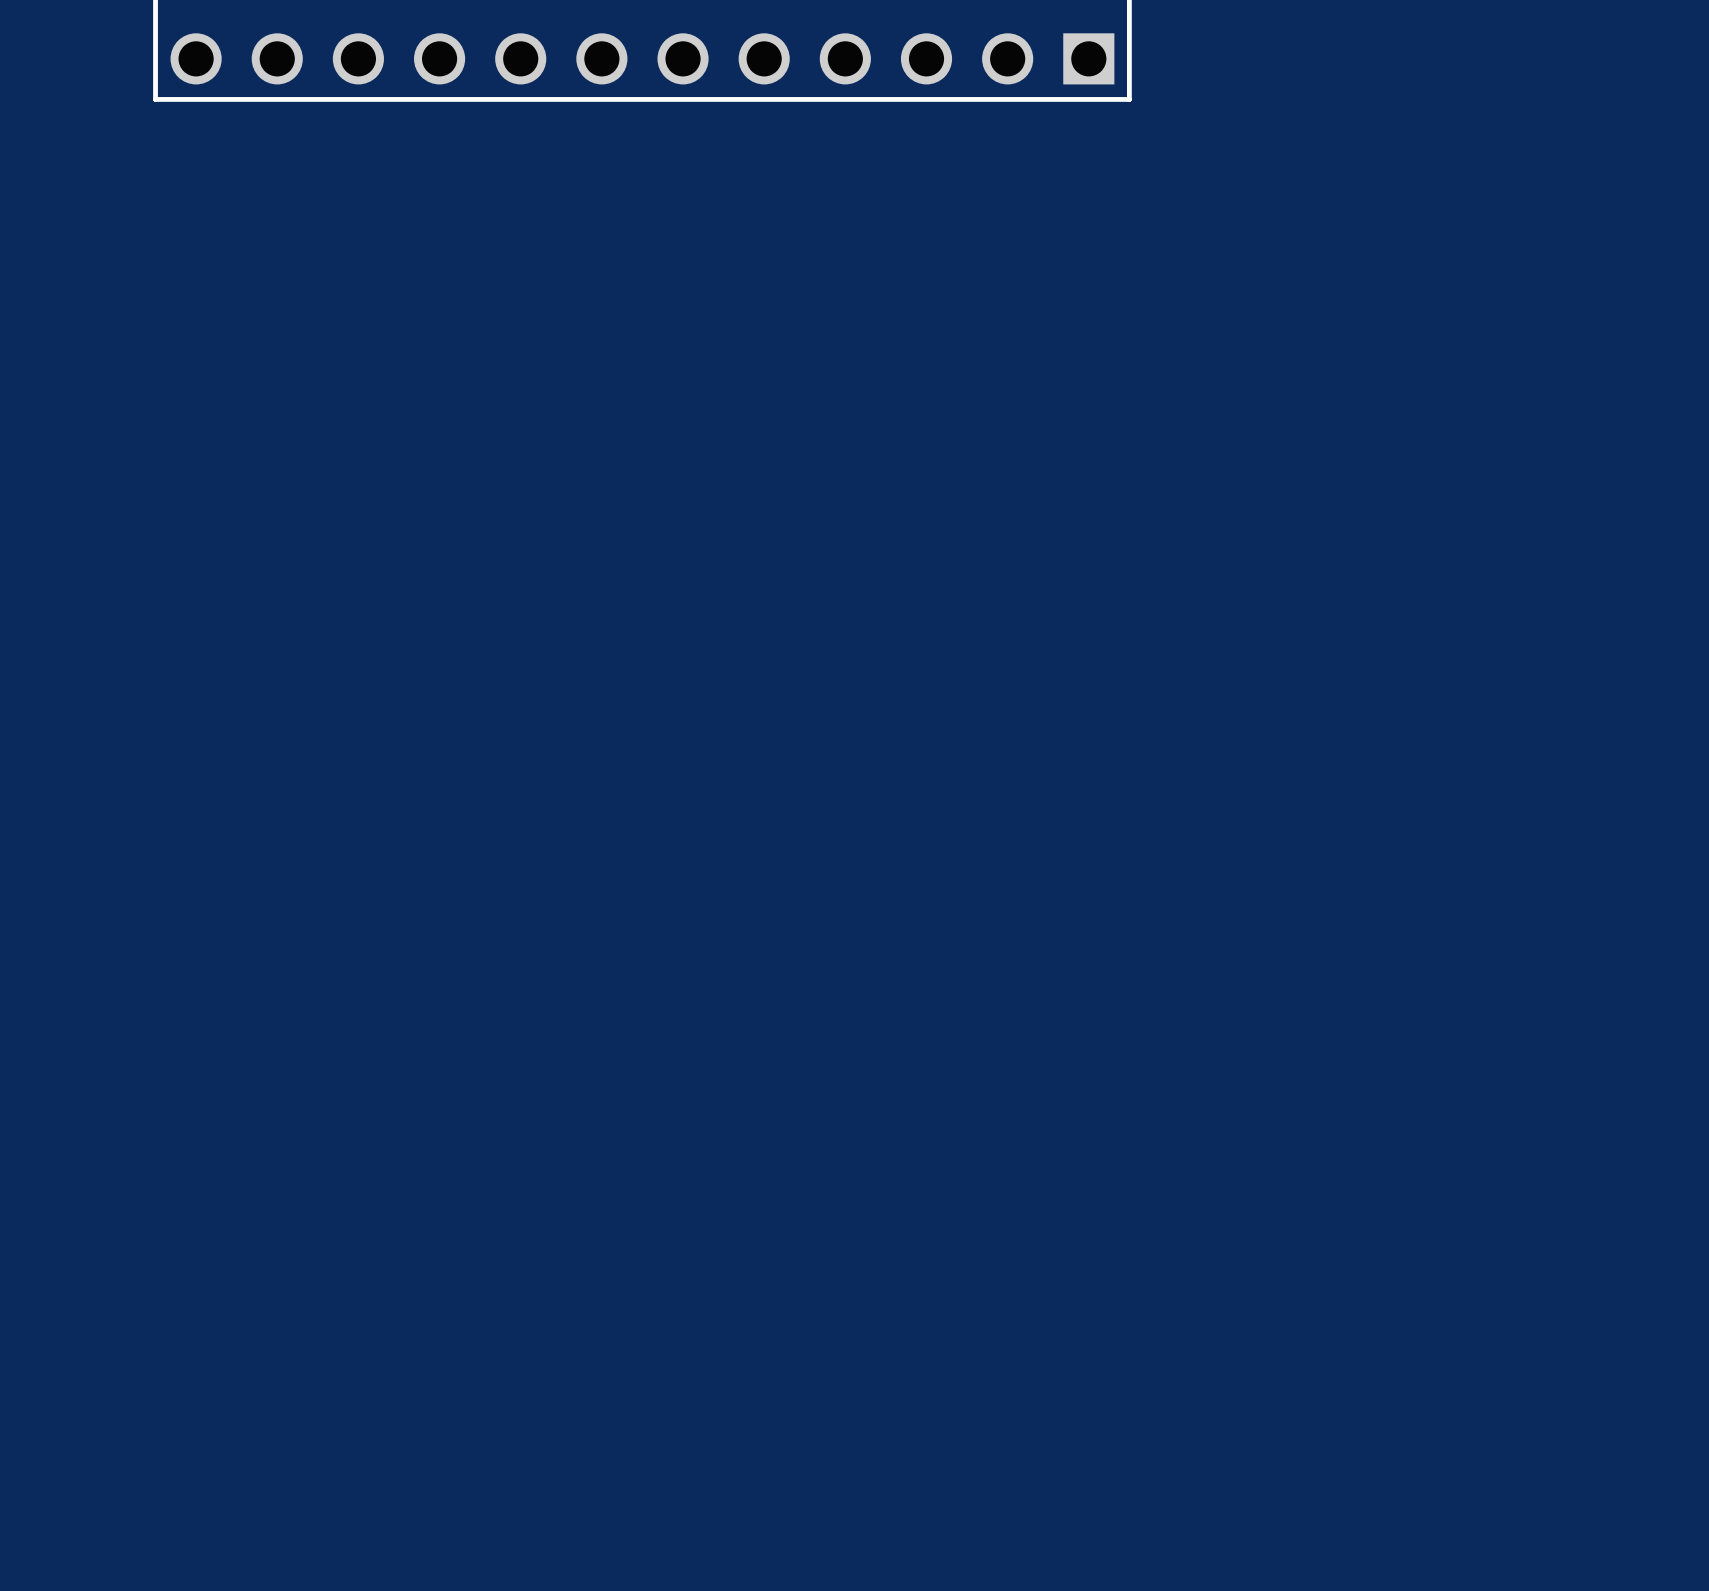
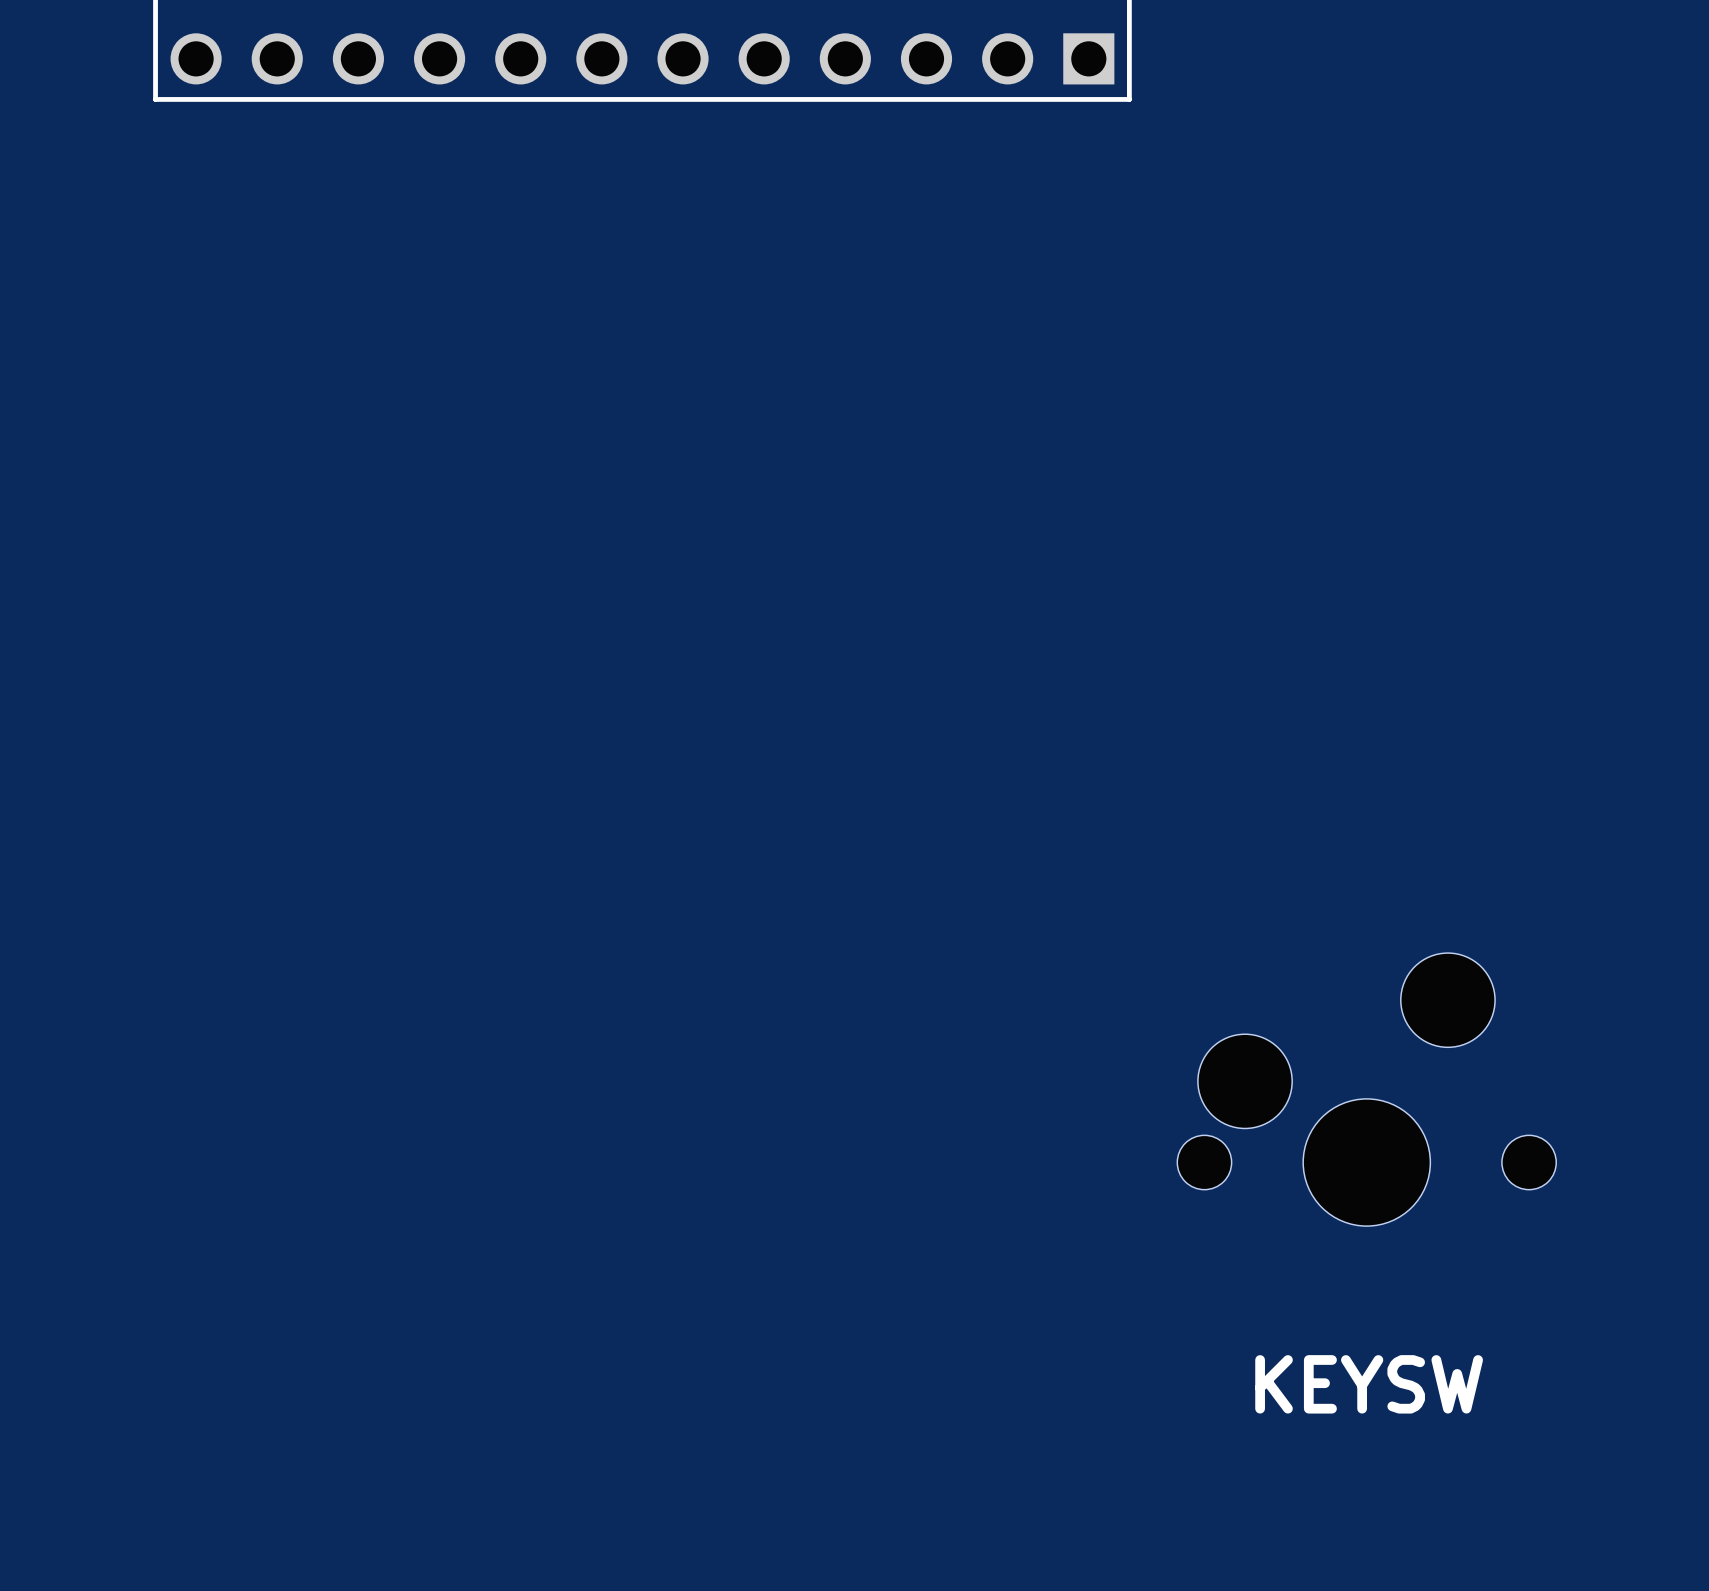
part: none -> KEYSW (1366, 1089)

